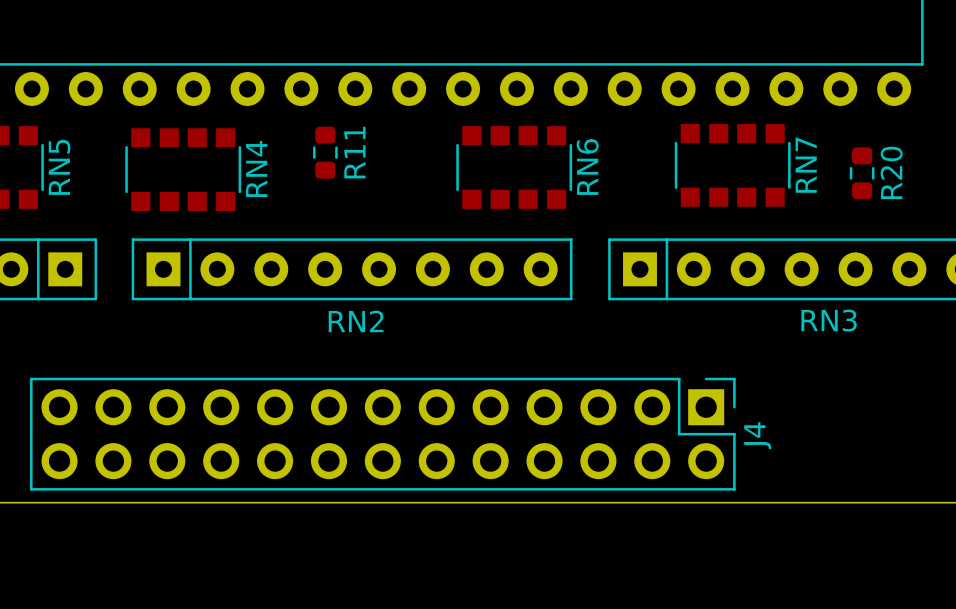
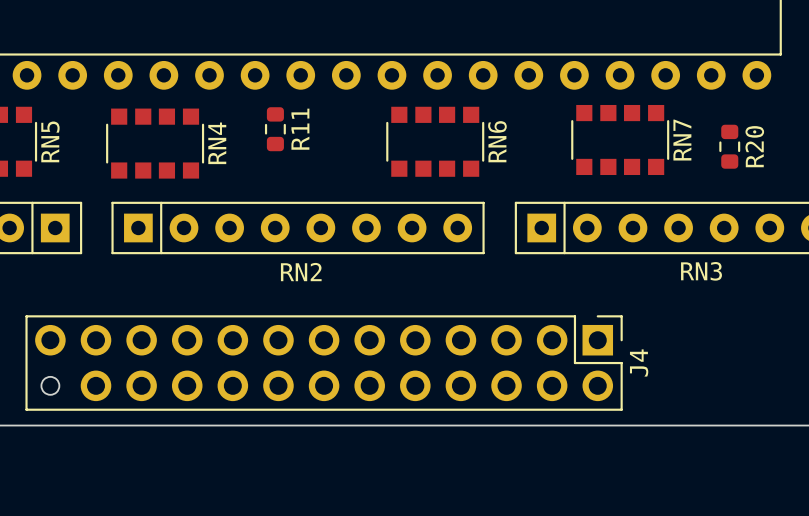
J4 footprint: [30, 377, 736, 491] -> [25, 315, 623, 411]

